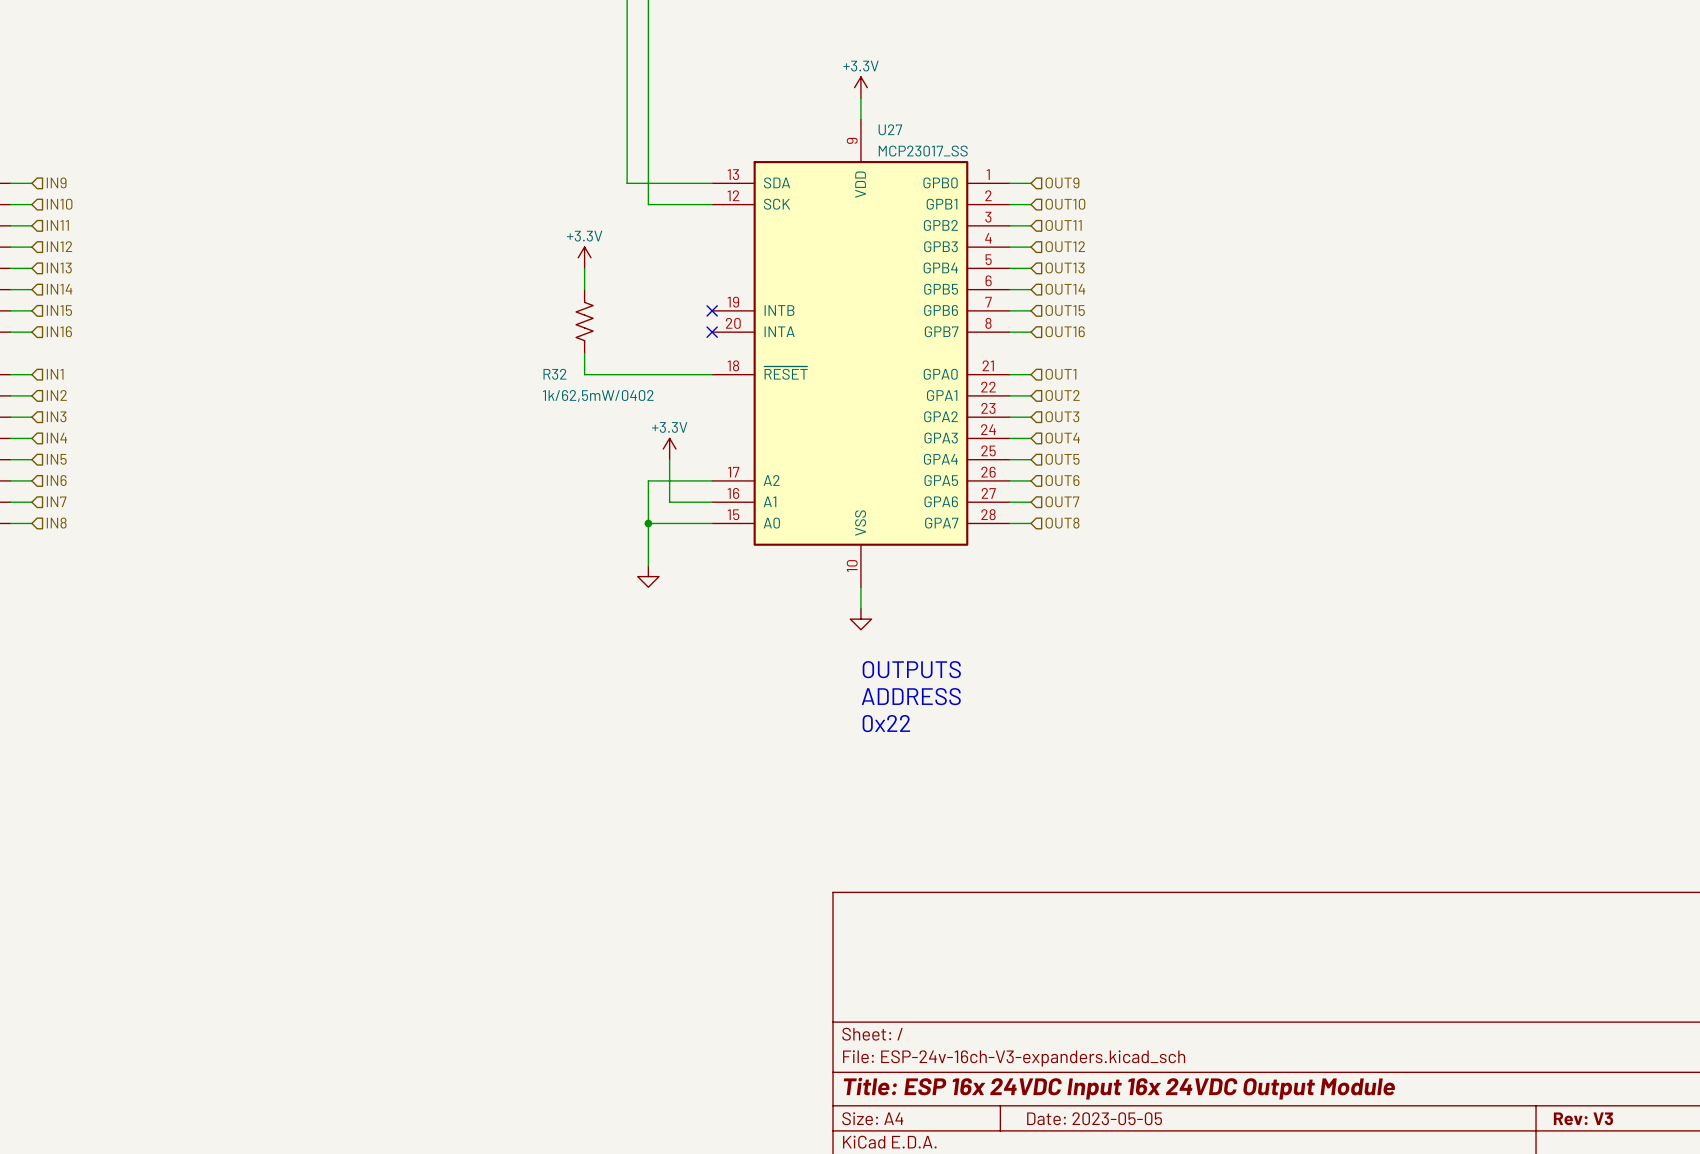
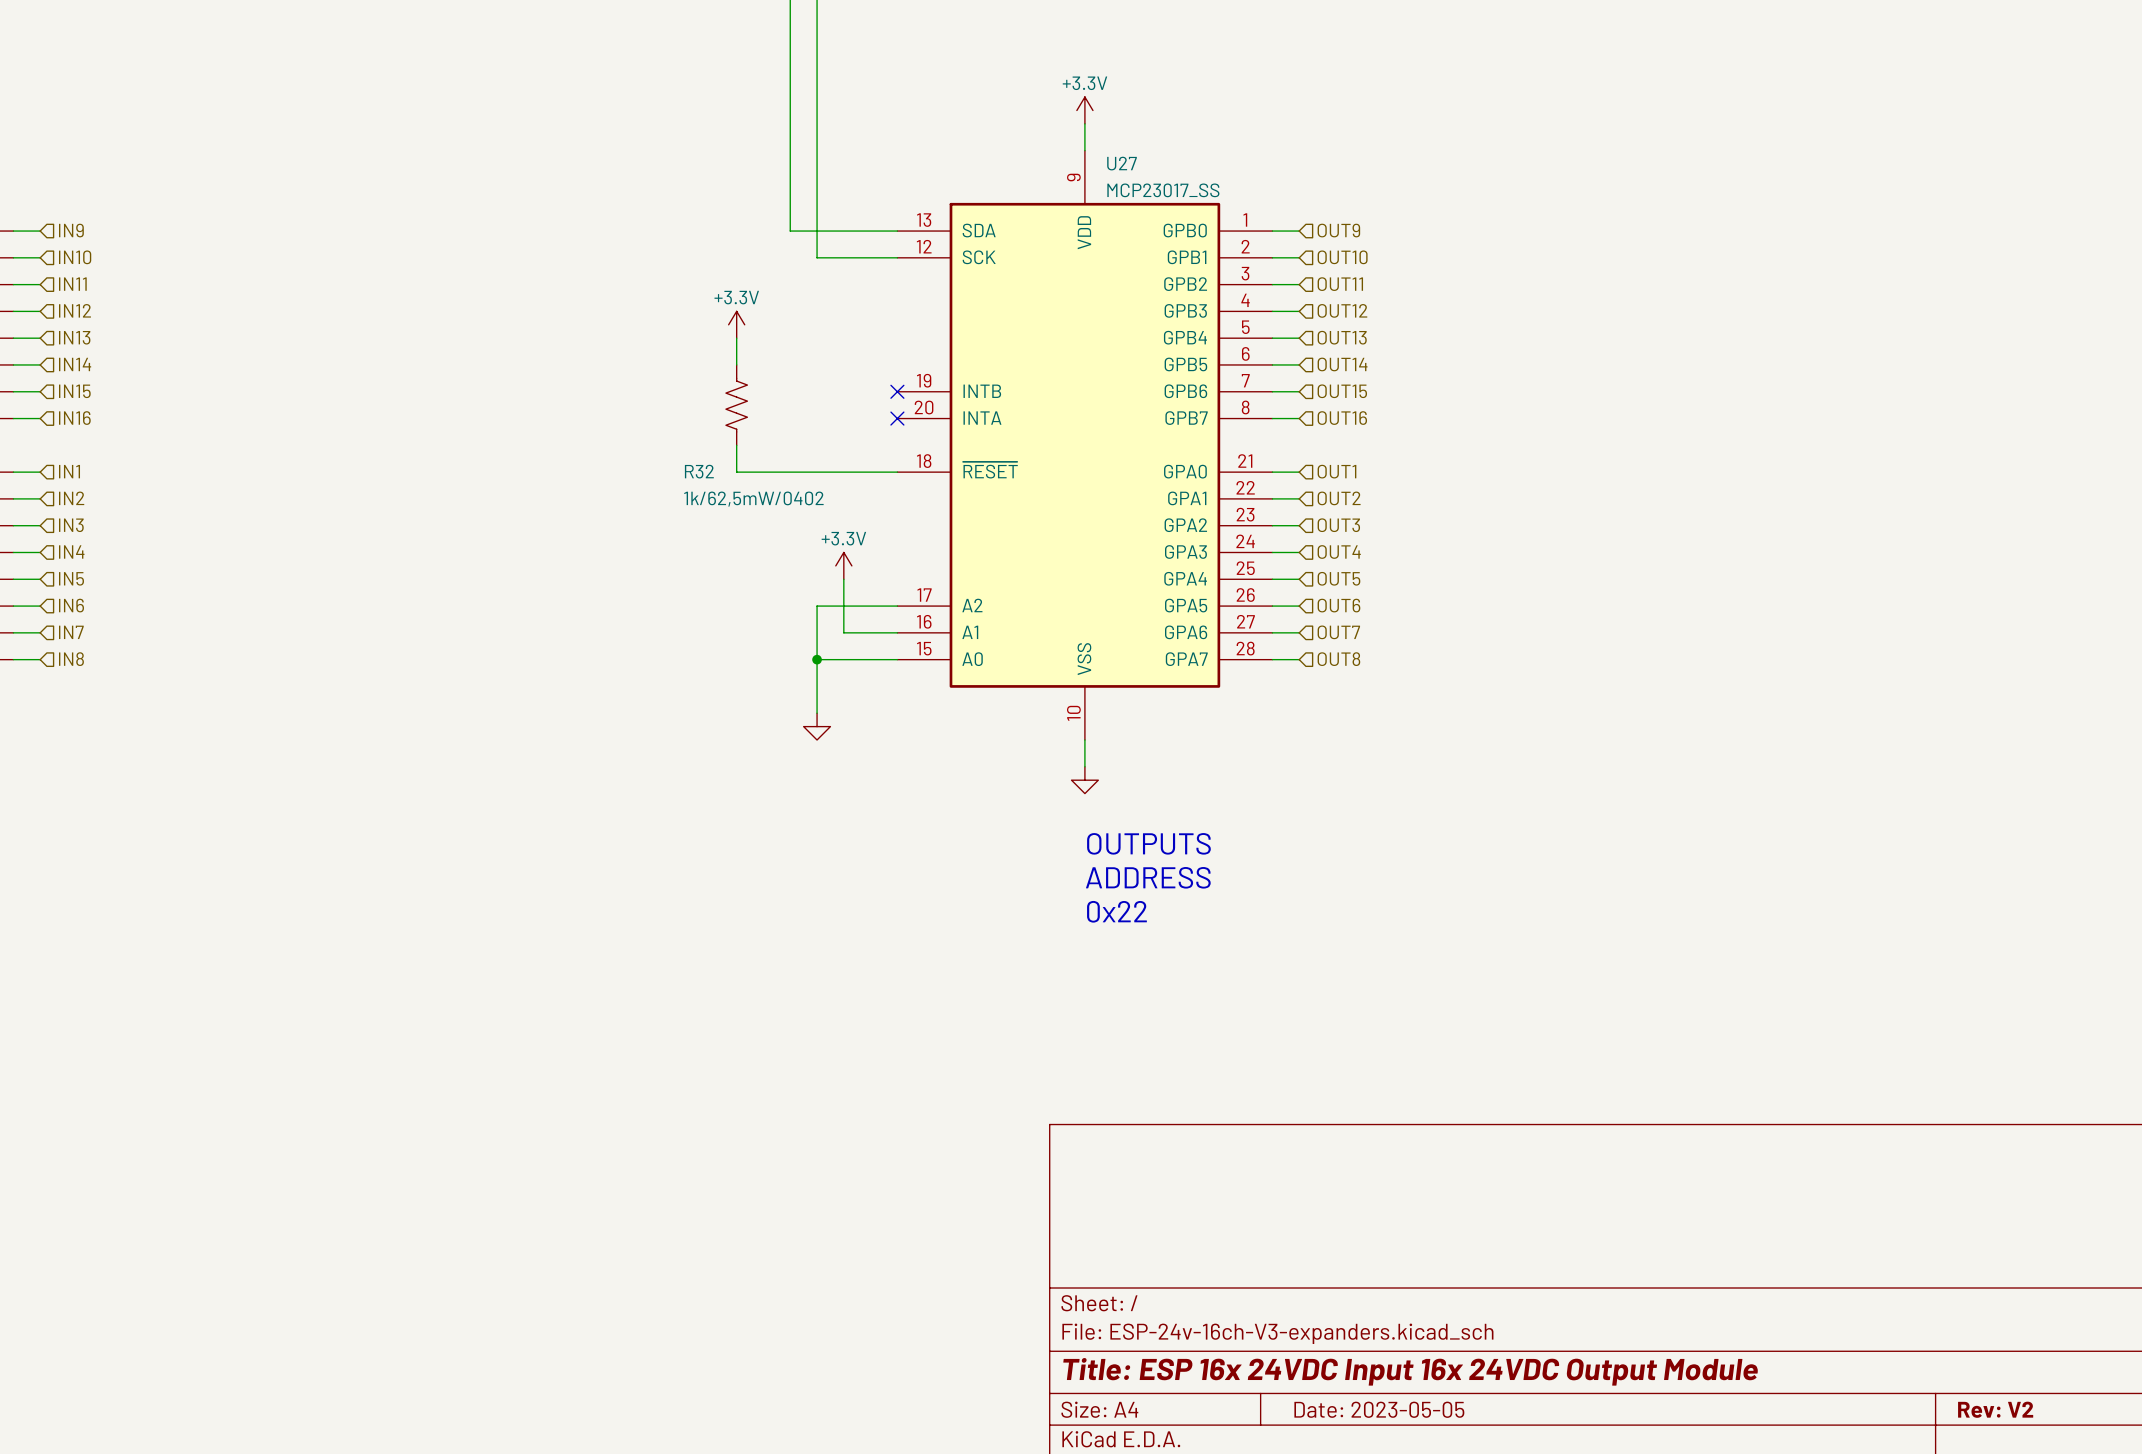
title block: Rev: V3 (1583, 1118) -> Rev: V2 (1995, 1409)

